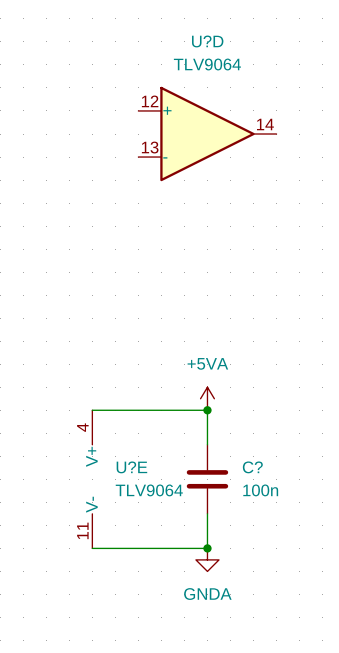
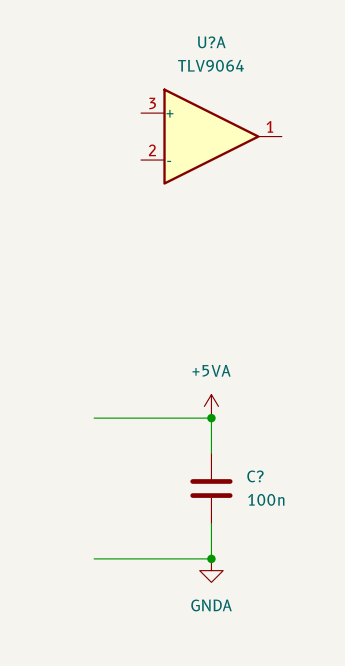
U?D name: U?D (207, 41) -> U?A (211, 42)
U?D pin number: 12 (150, 101) -> 3 (152, 103)
U?D pin number: 14 (265, 124) -> 1 (269, 126)
U?D pin number: 13 (150, 147) -> 2 (152, 150)
U?E: TLV9064 (92, 479) -> none

